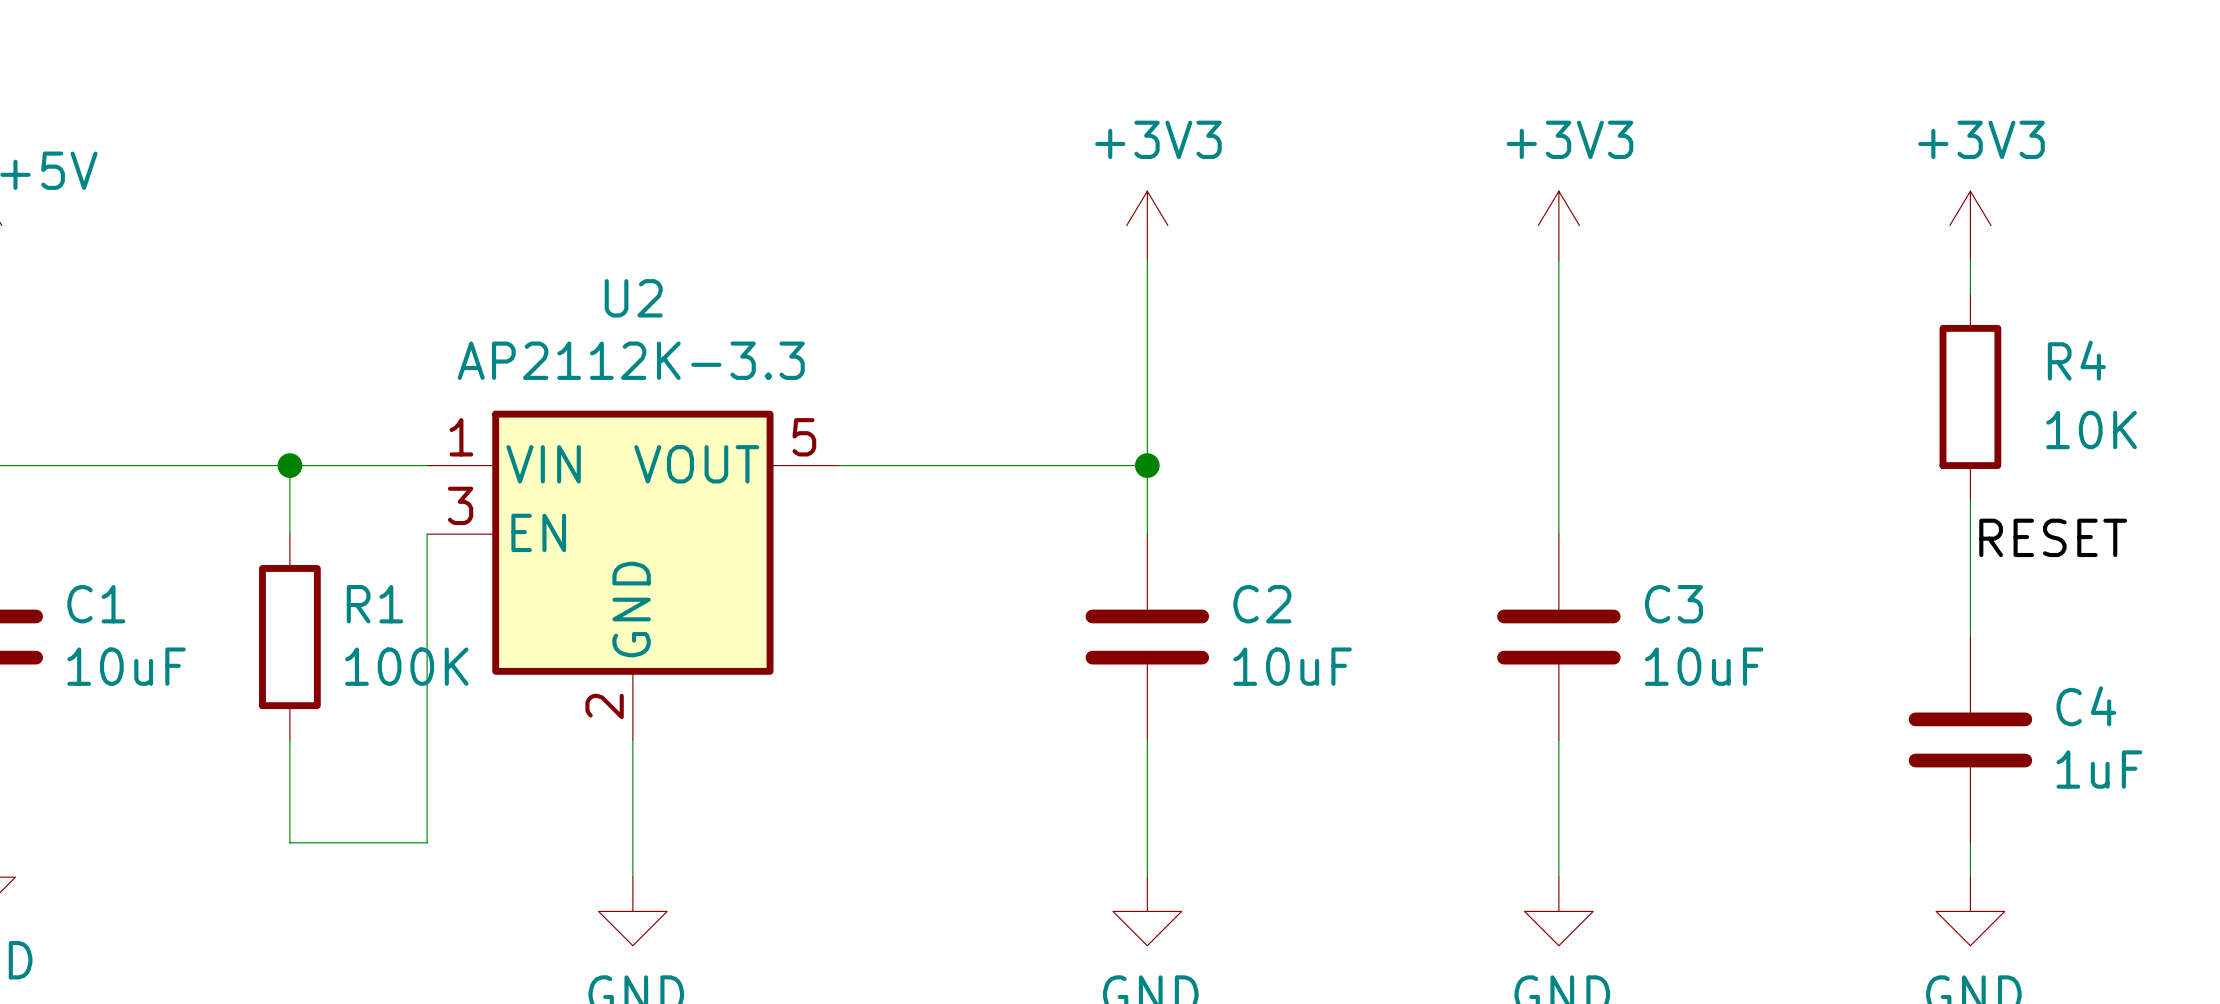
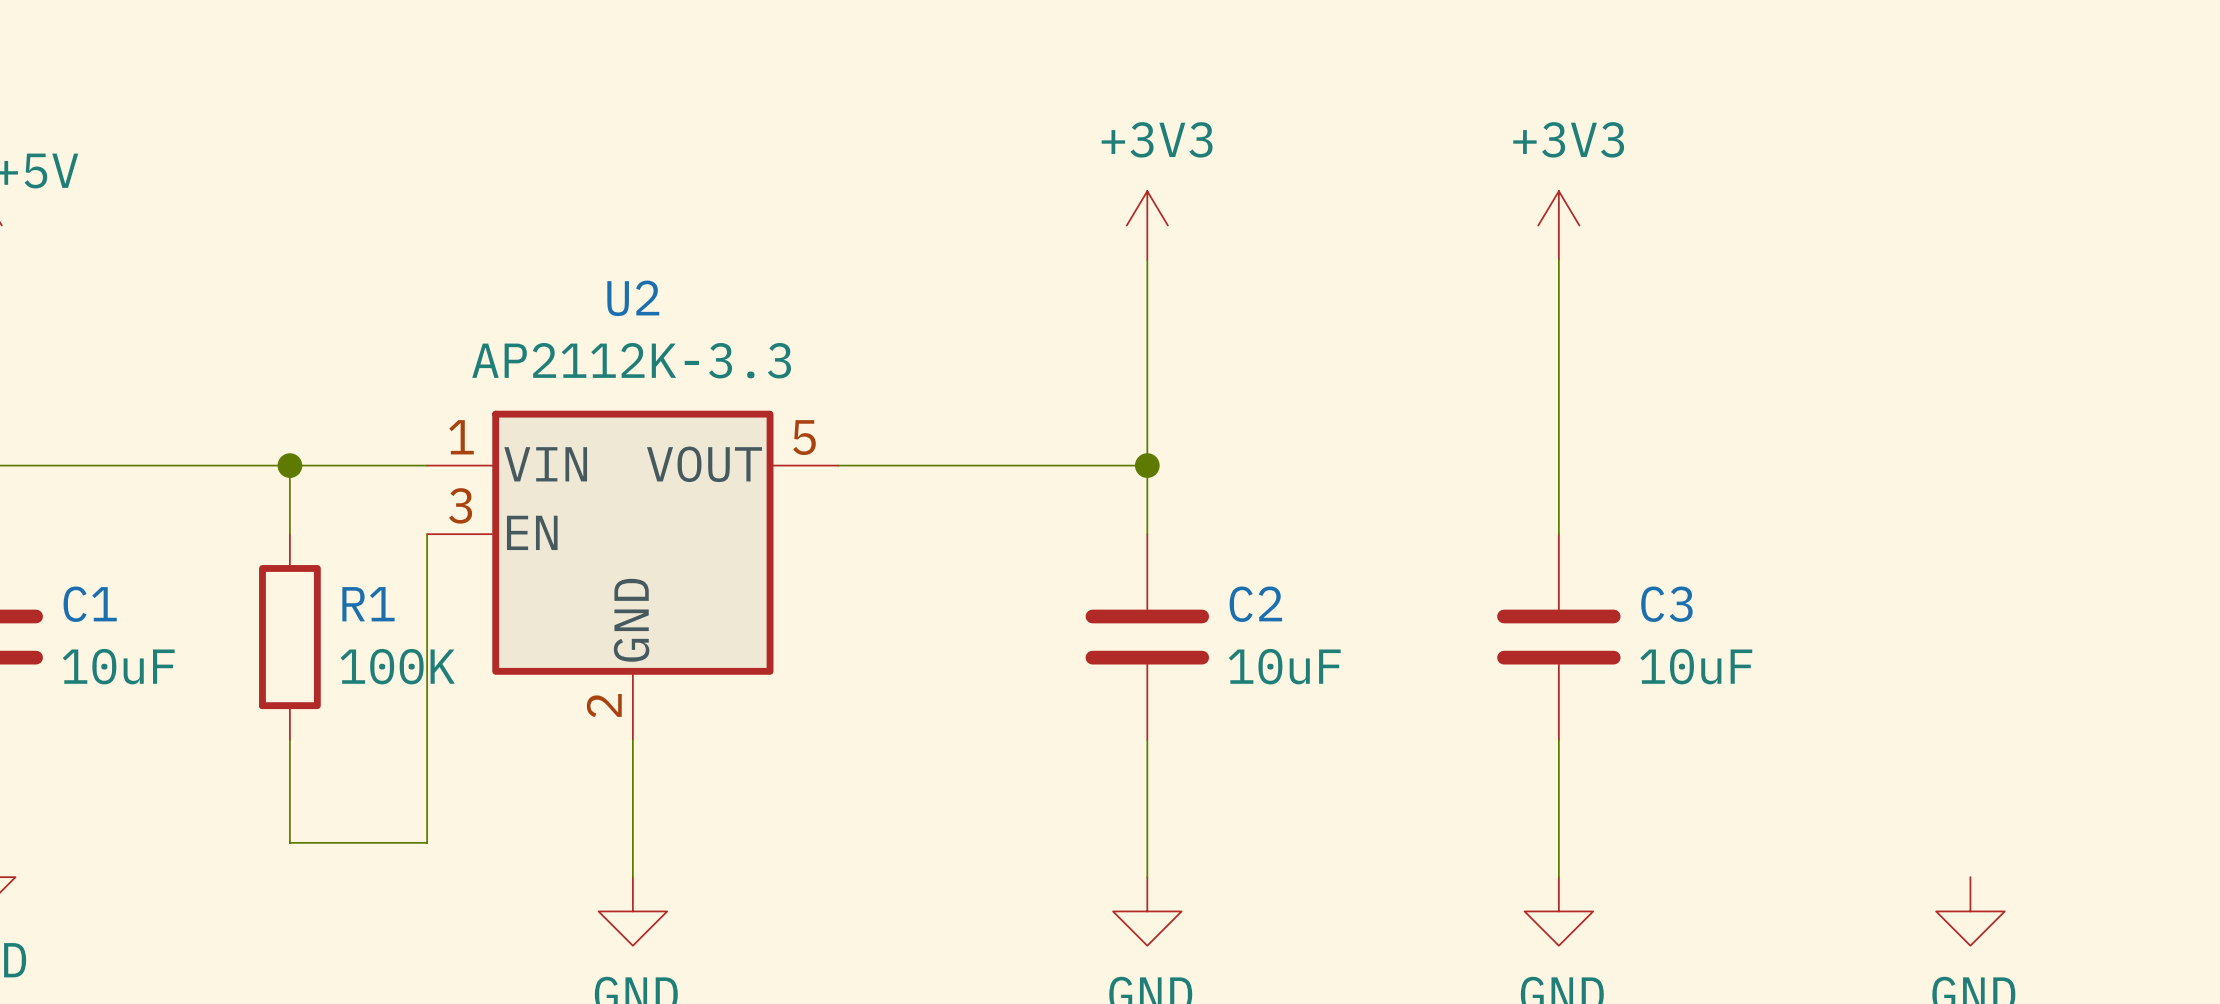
power symbol: +3V3 (1970, 225) -> none
wire: (1970, 259) (1970, 294) -> none
R4: 10K (1970, 396) -> none
wire: (1970, 499) (1970, 637) -> none
label: RESET (2053, 537) -> none
C4: 1uF (1970, 739) -> none
wire: (1970, 842) (1970, 877) -> none

